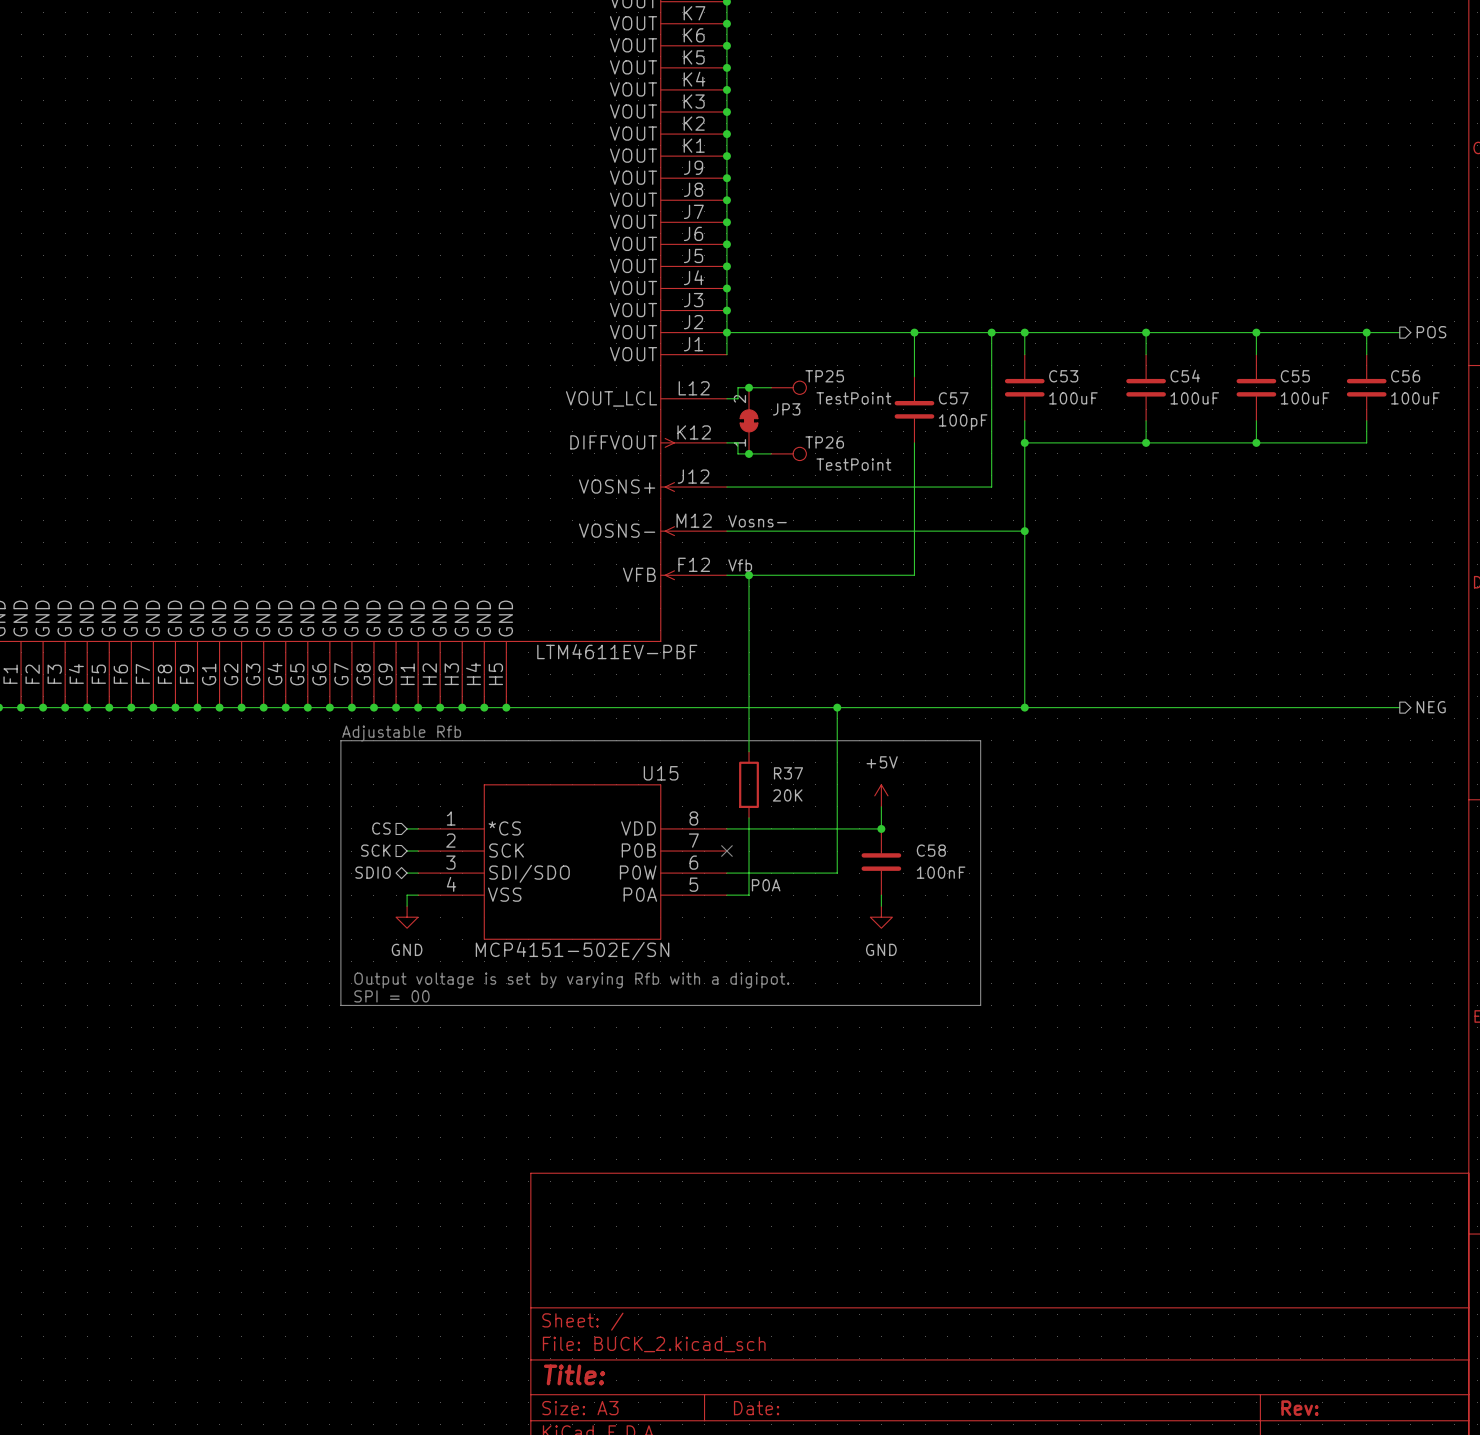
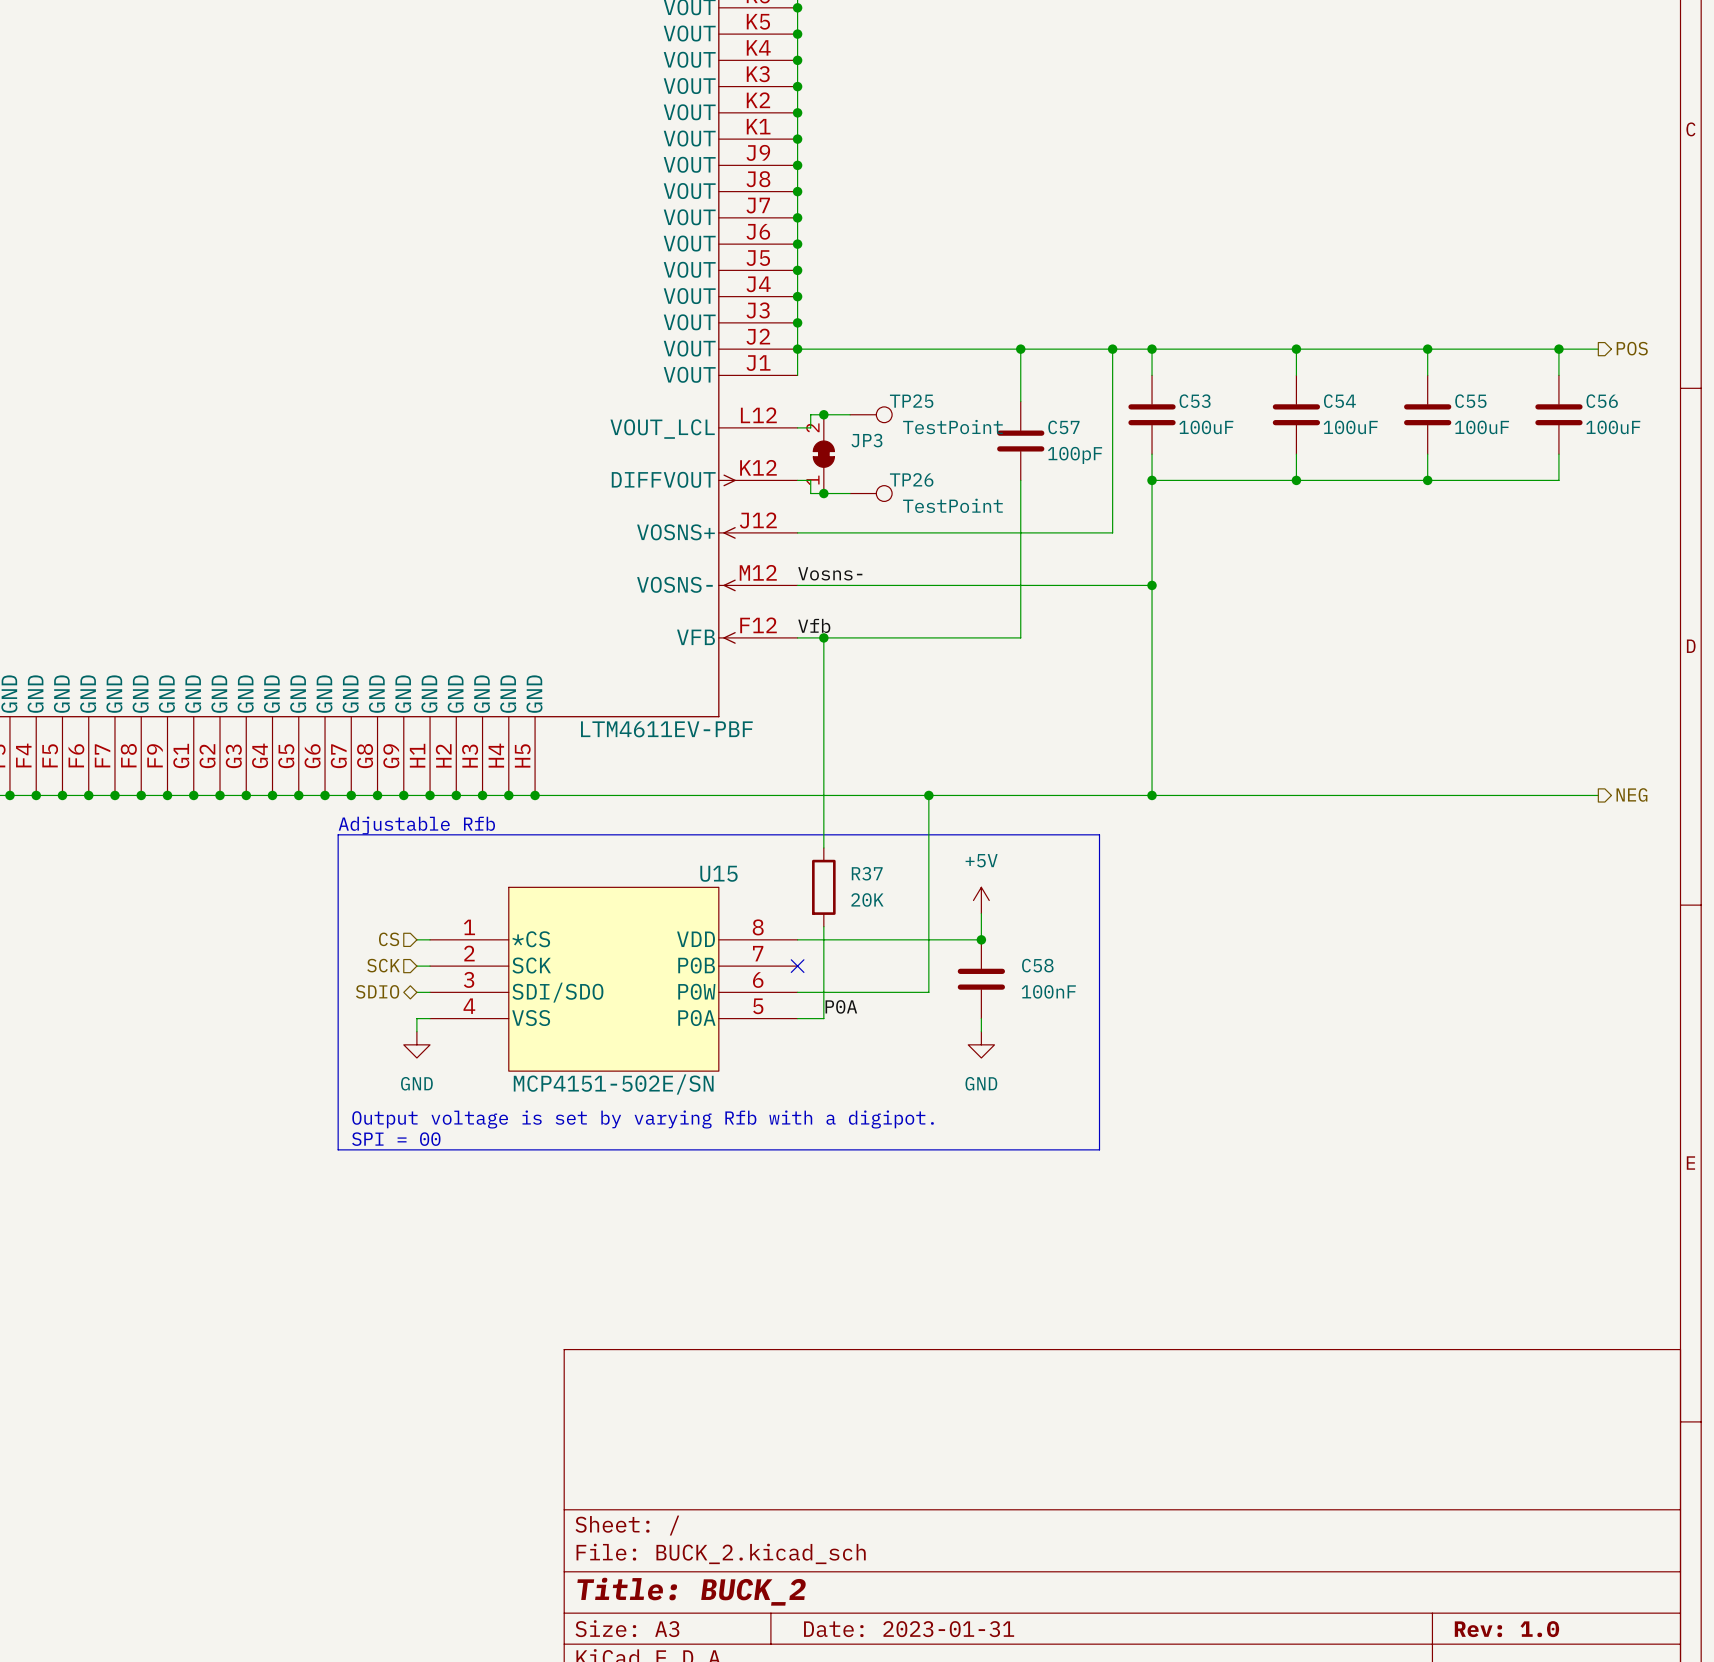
title block: Title: (574, 1374) -> Title: BUCK_2 (691, 1591)
title block: Date: (756, 1408) -> Date: 2023-01-31 (909, 1629)
title block: Rev: (1299, 1408) -> Rev: 1.0 (1506, 1629)

